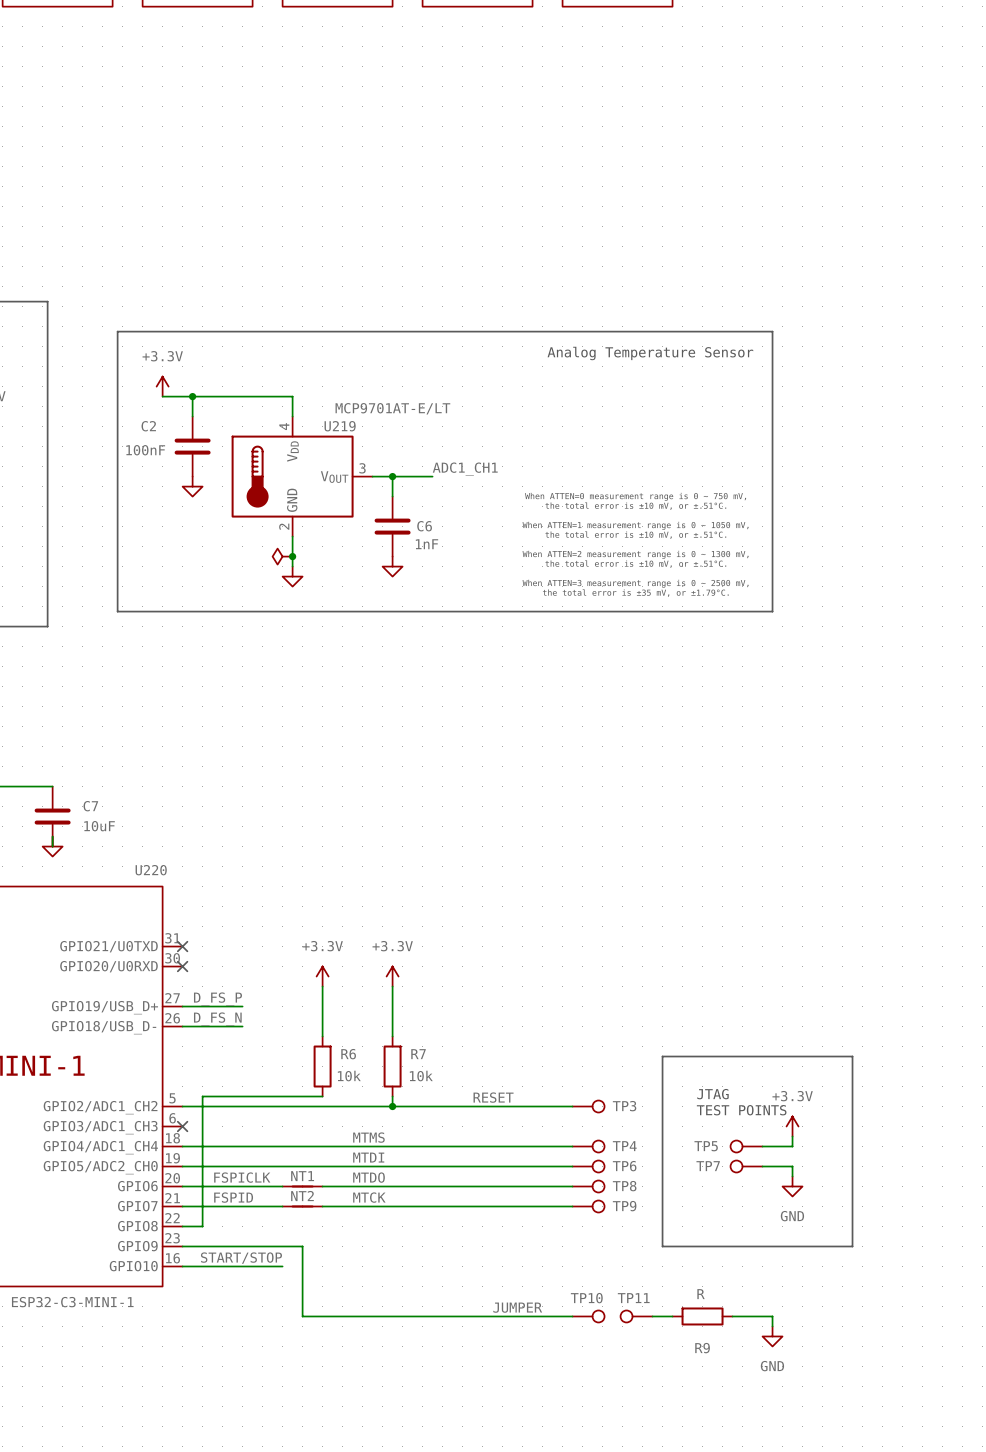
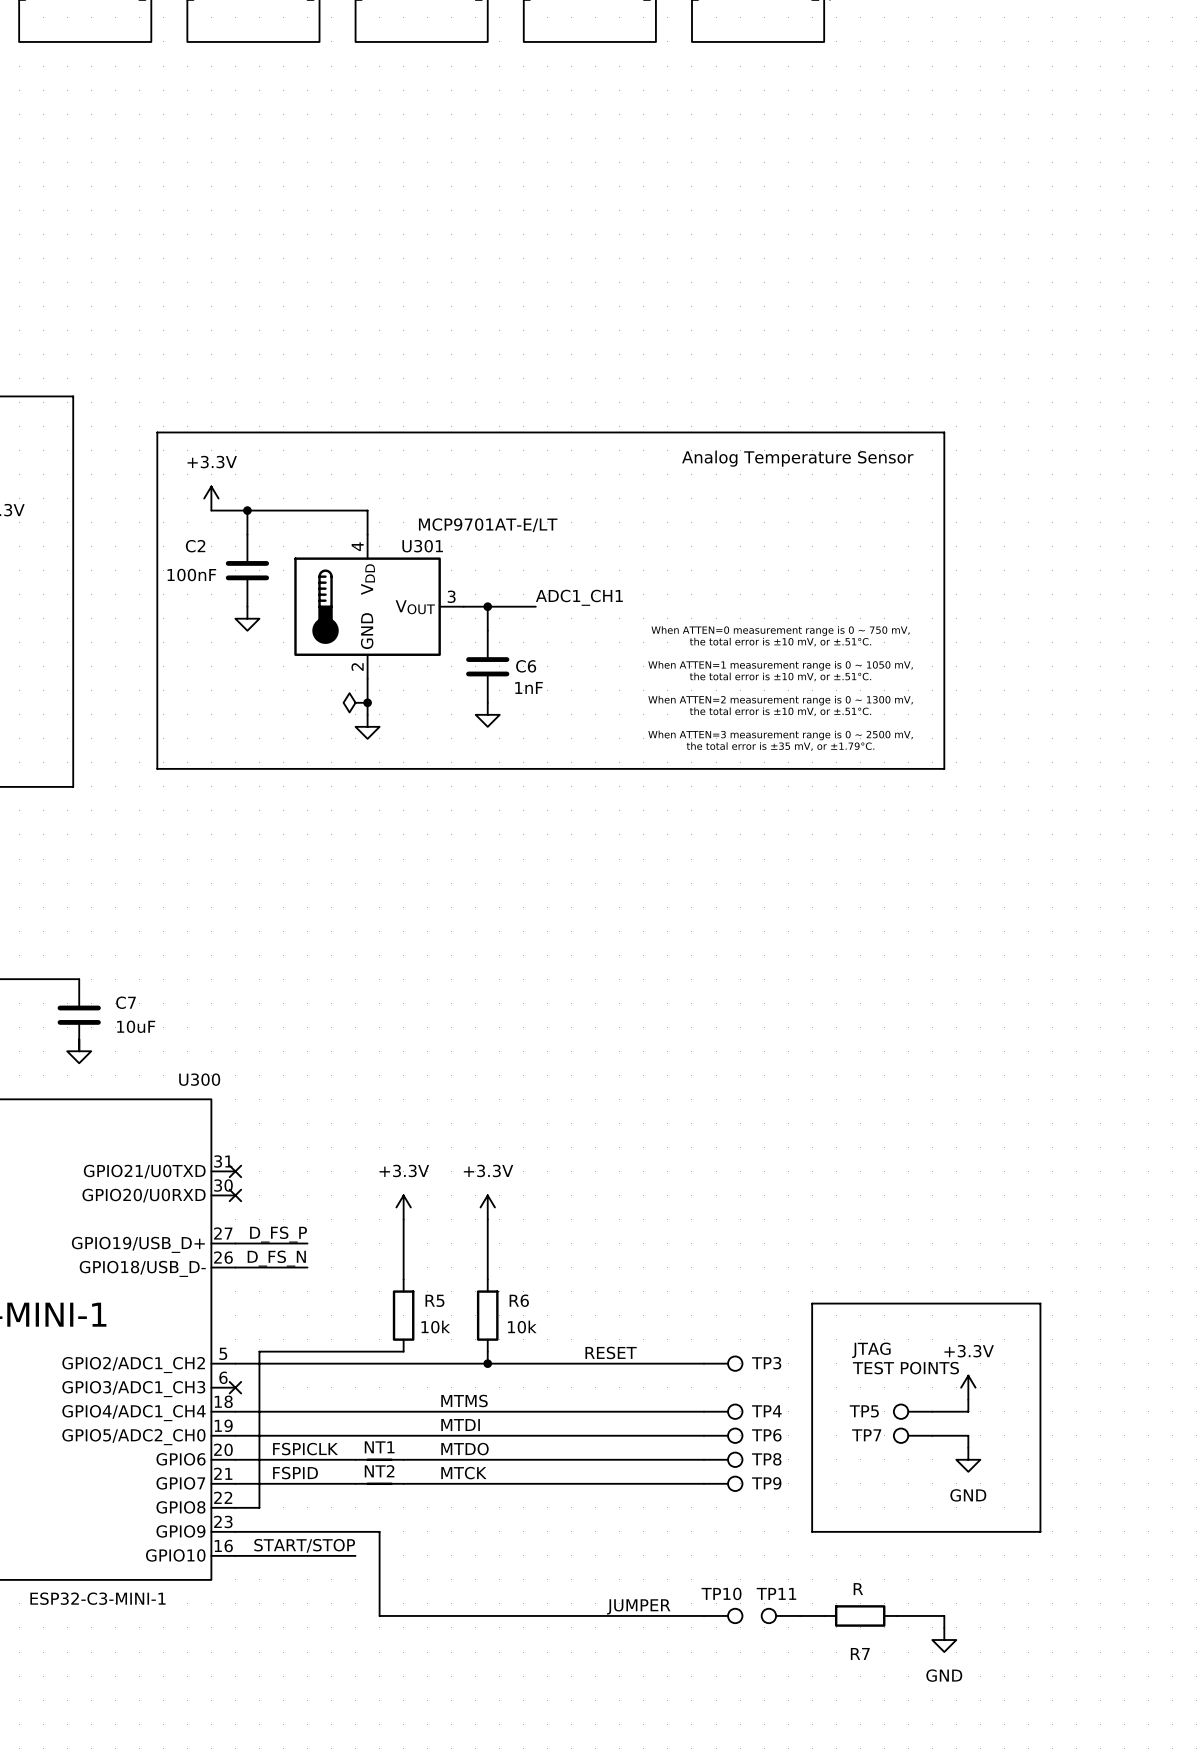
U219 name: U219 (340, 426) -> U301 (422, 546)
U220 name: U220 (151, 870) -> U300 (199, 1079)
R6 name: R6 (348, 1054) -> R5 (434, 1300)
R7 name: R7 (418, 1054) -> R6 (519, 1300)
R9 name: R9 (702, 1348) -> R7 (860, 1653)

